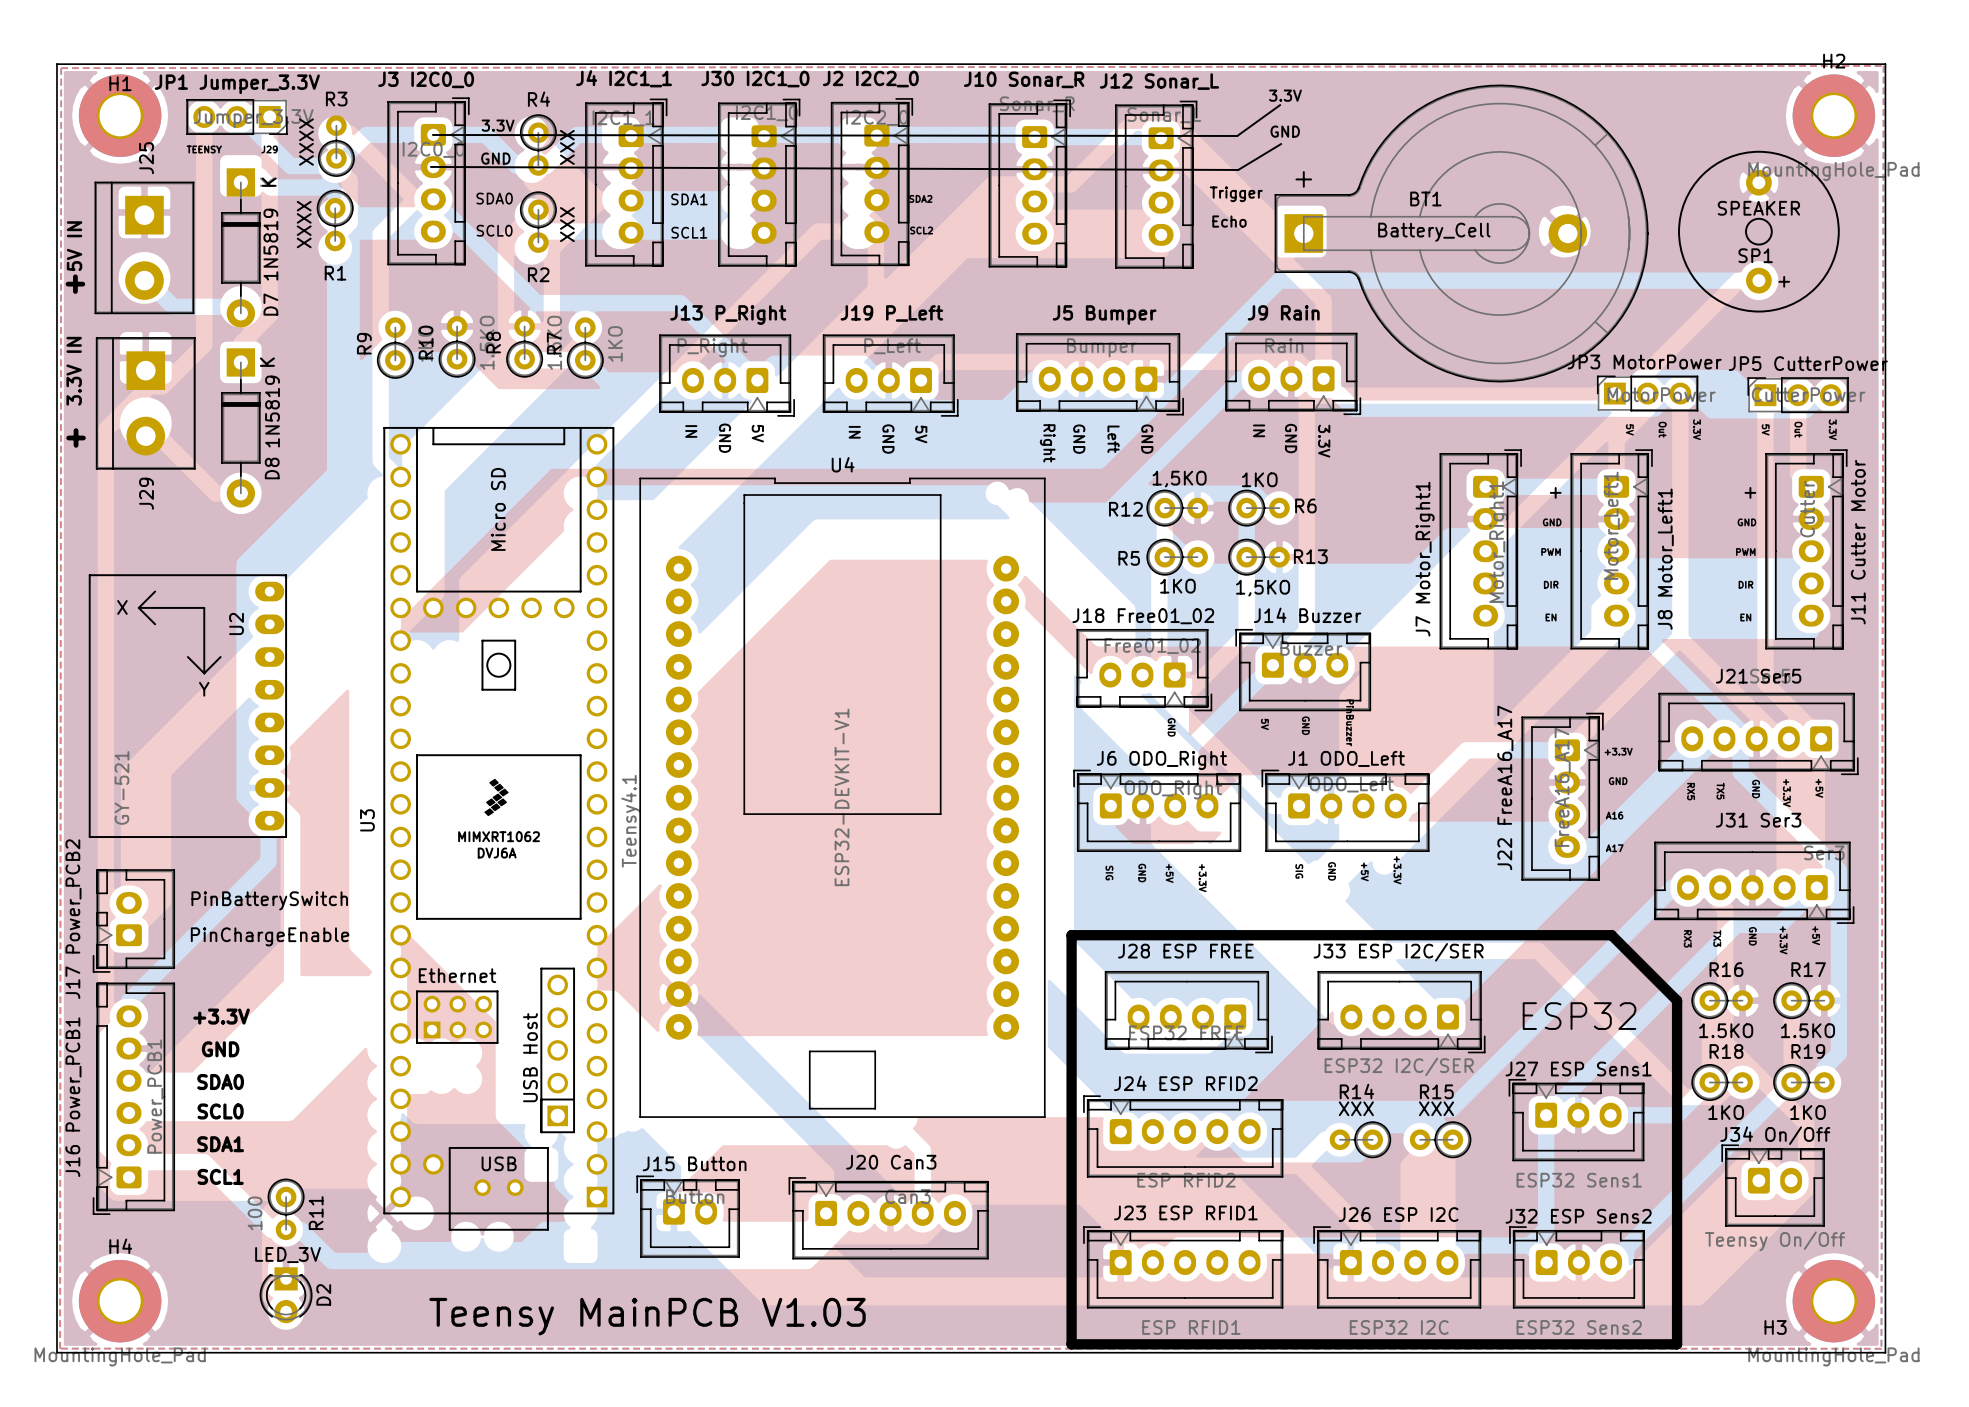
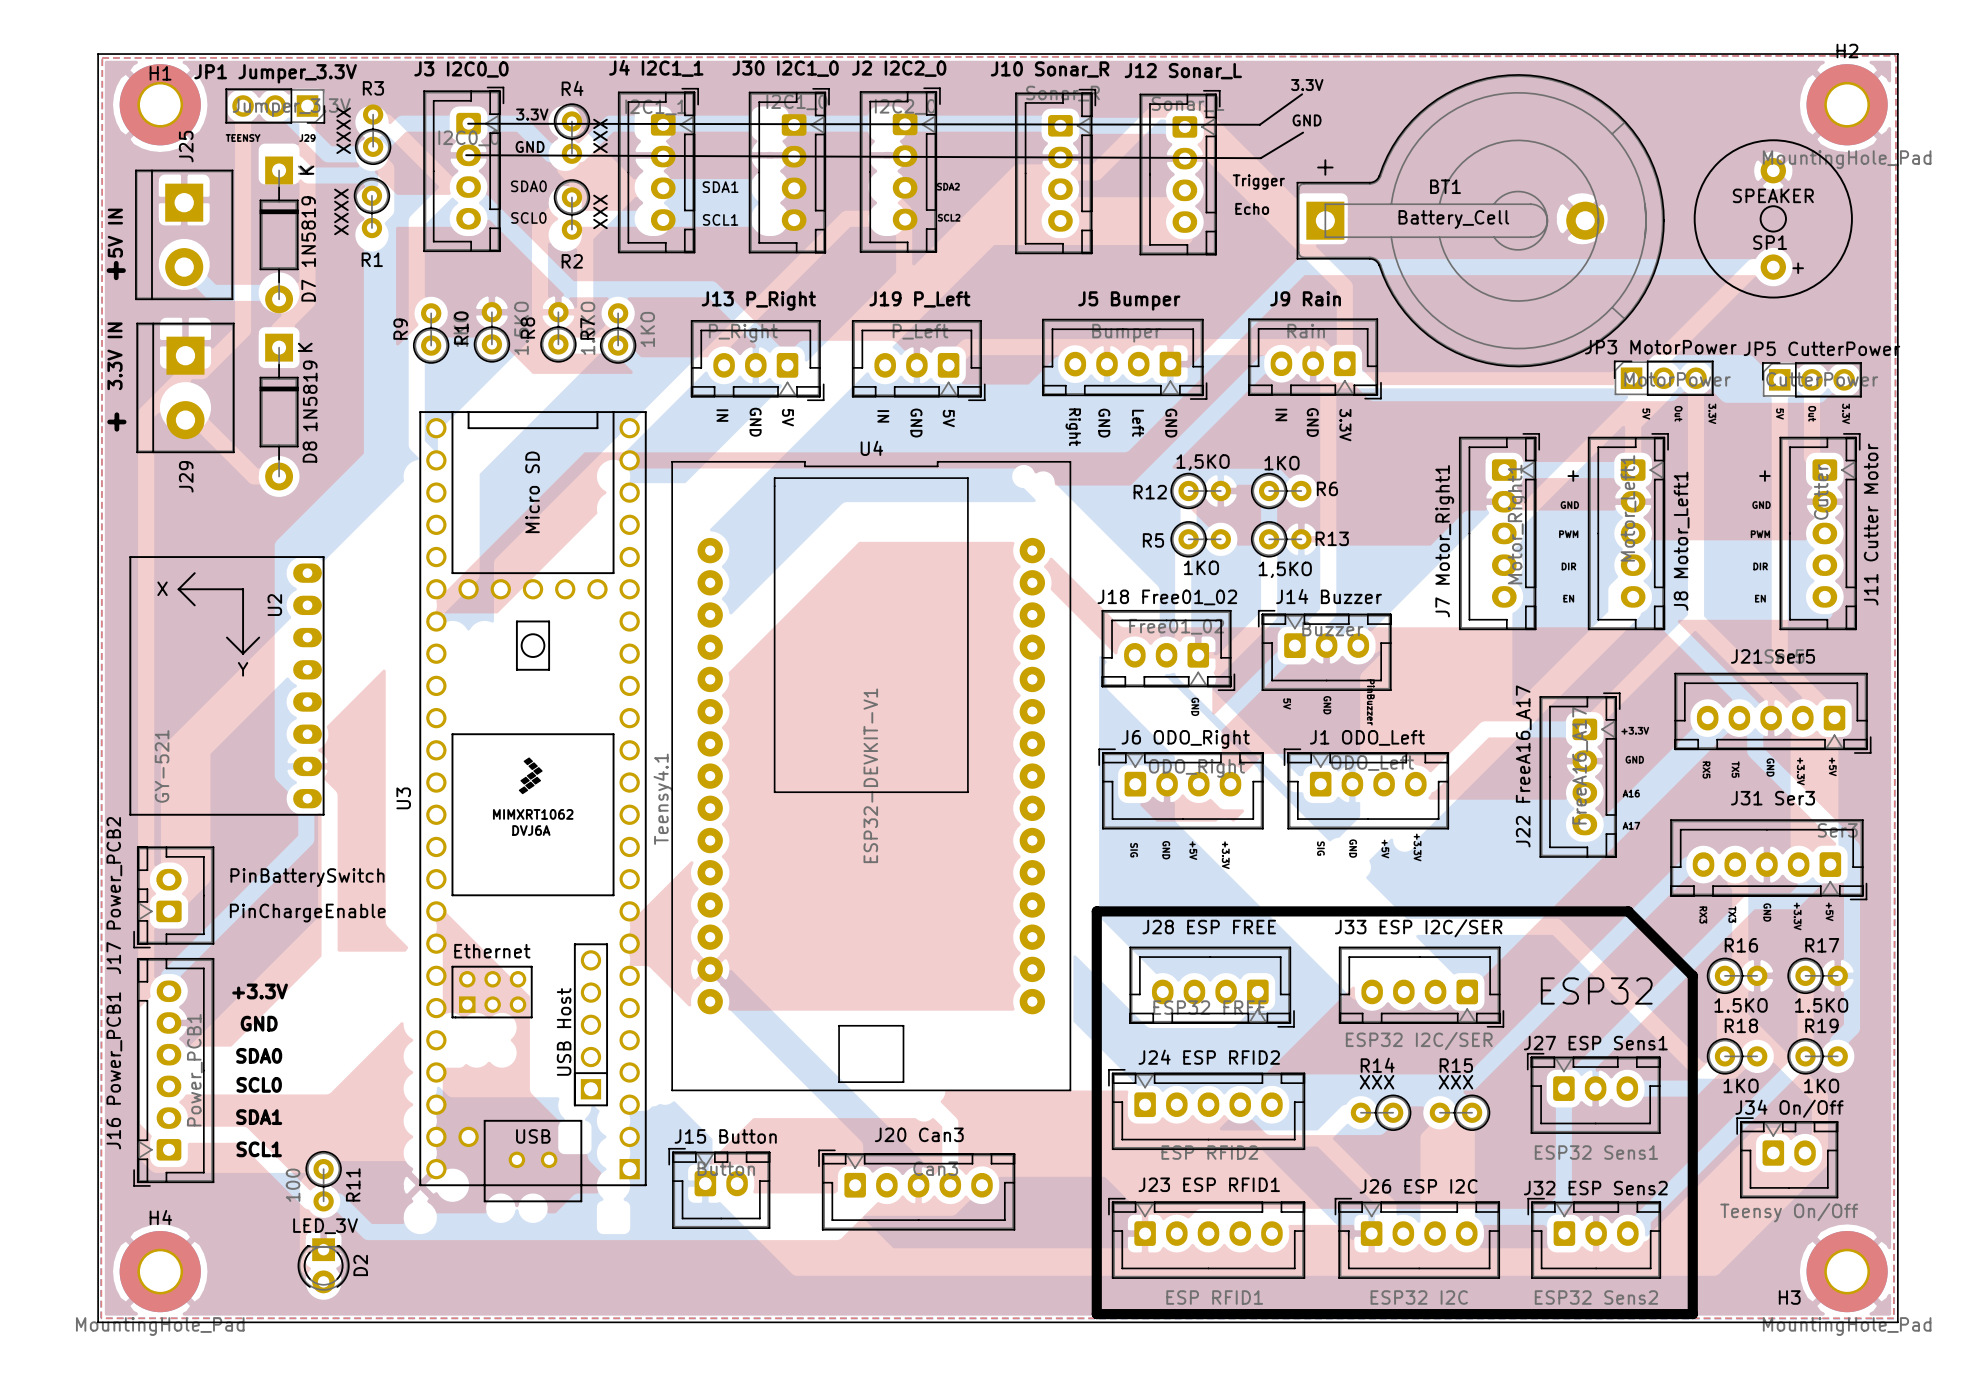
text: Teensy MainPCB V1.03 (647, 1316) -> none

